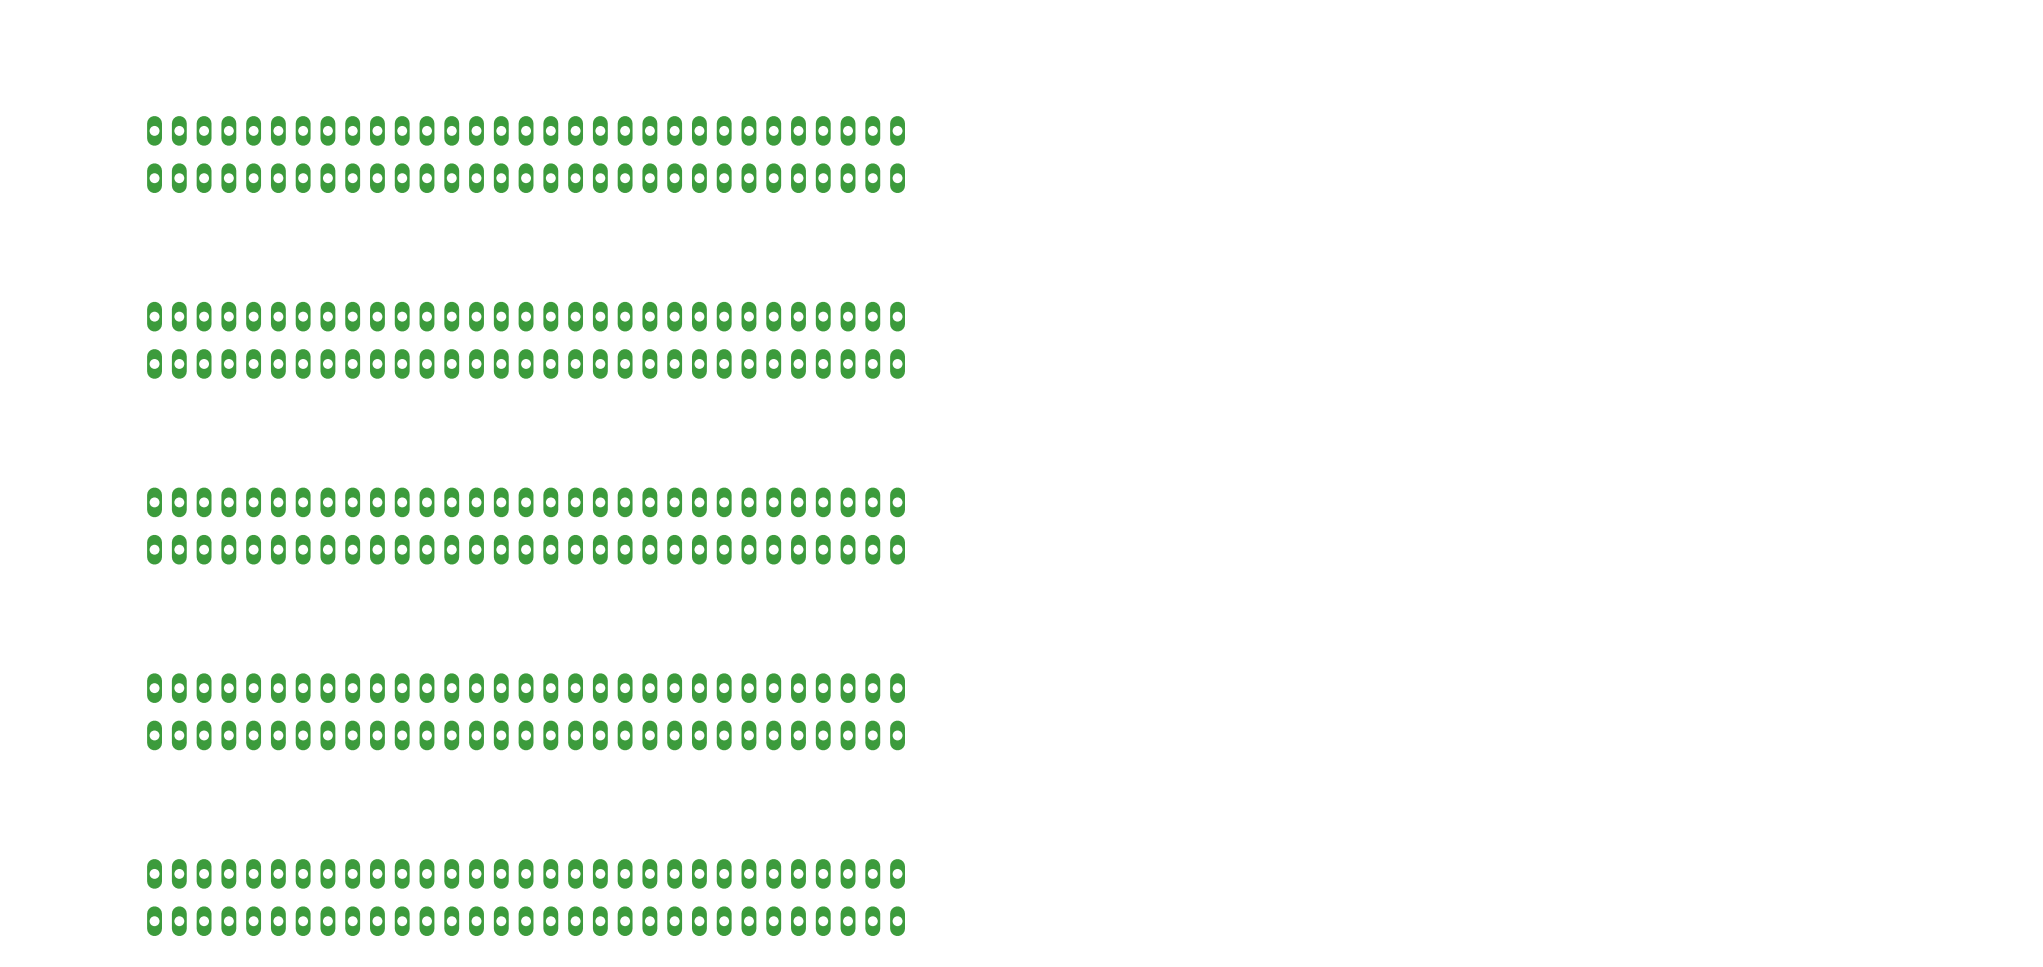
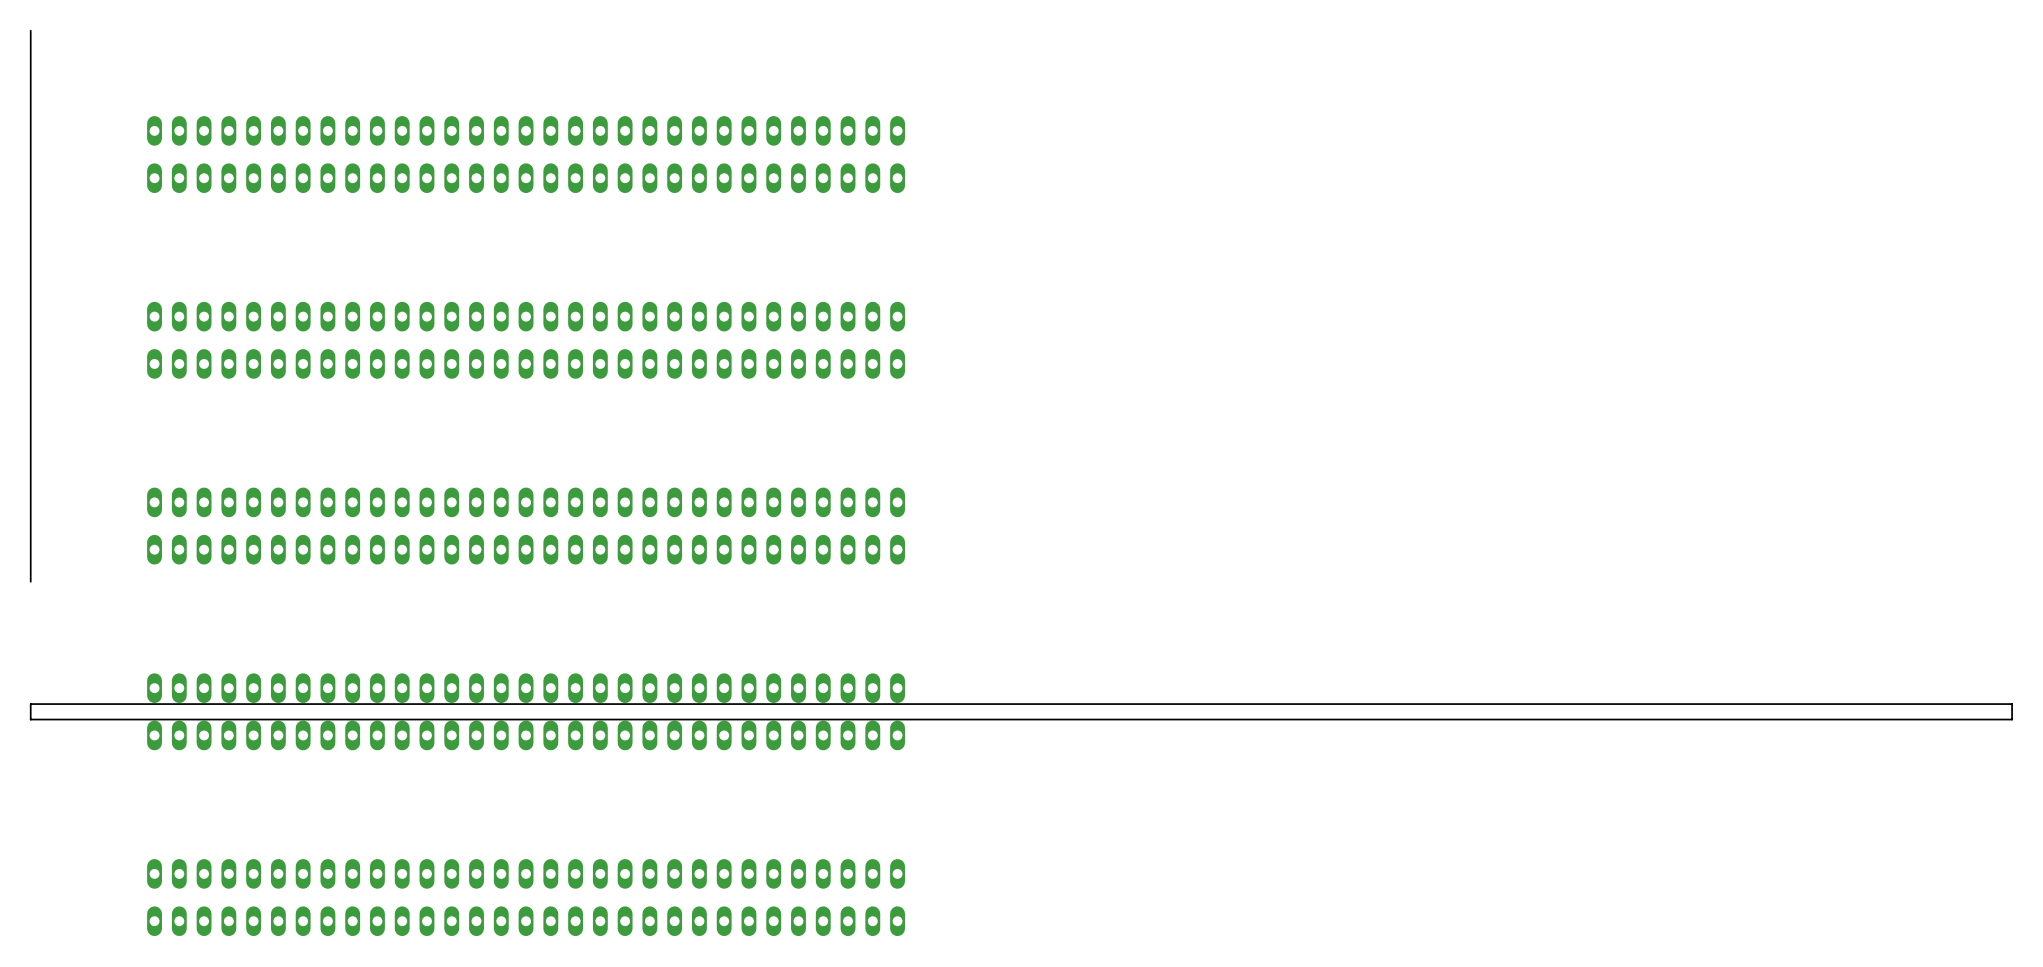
board edge: none -> (30, 30) (30, 581)
board edge: none -> (2012, 704) (30, 704) (30, 719) (2012, 719) (2012, 704)

